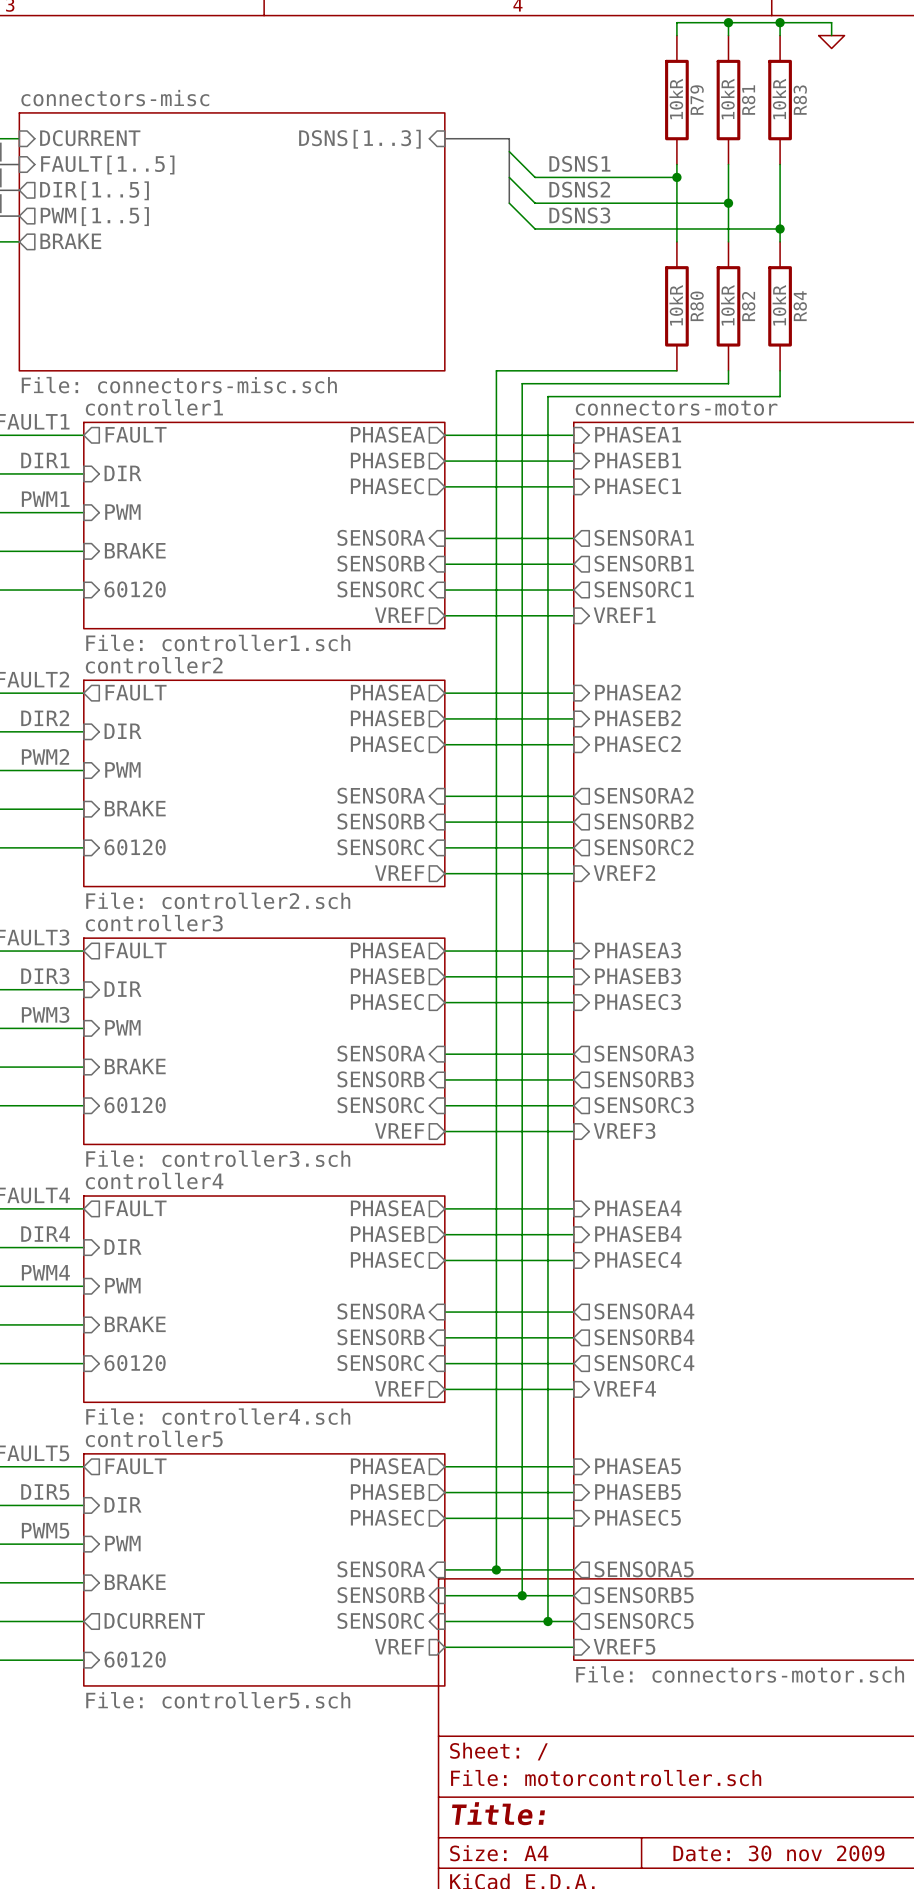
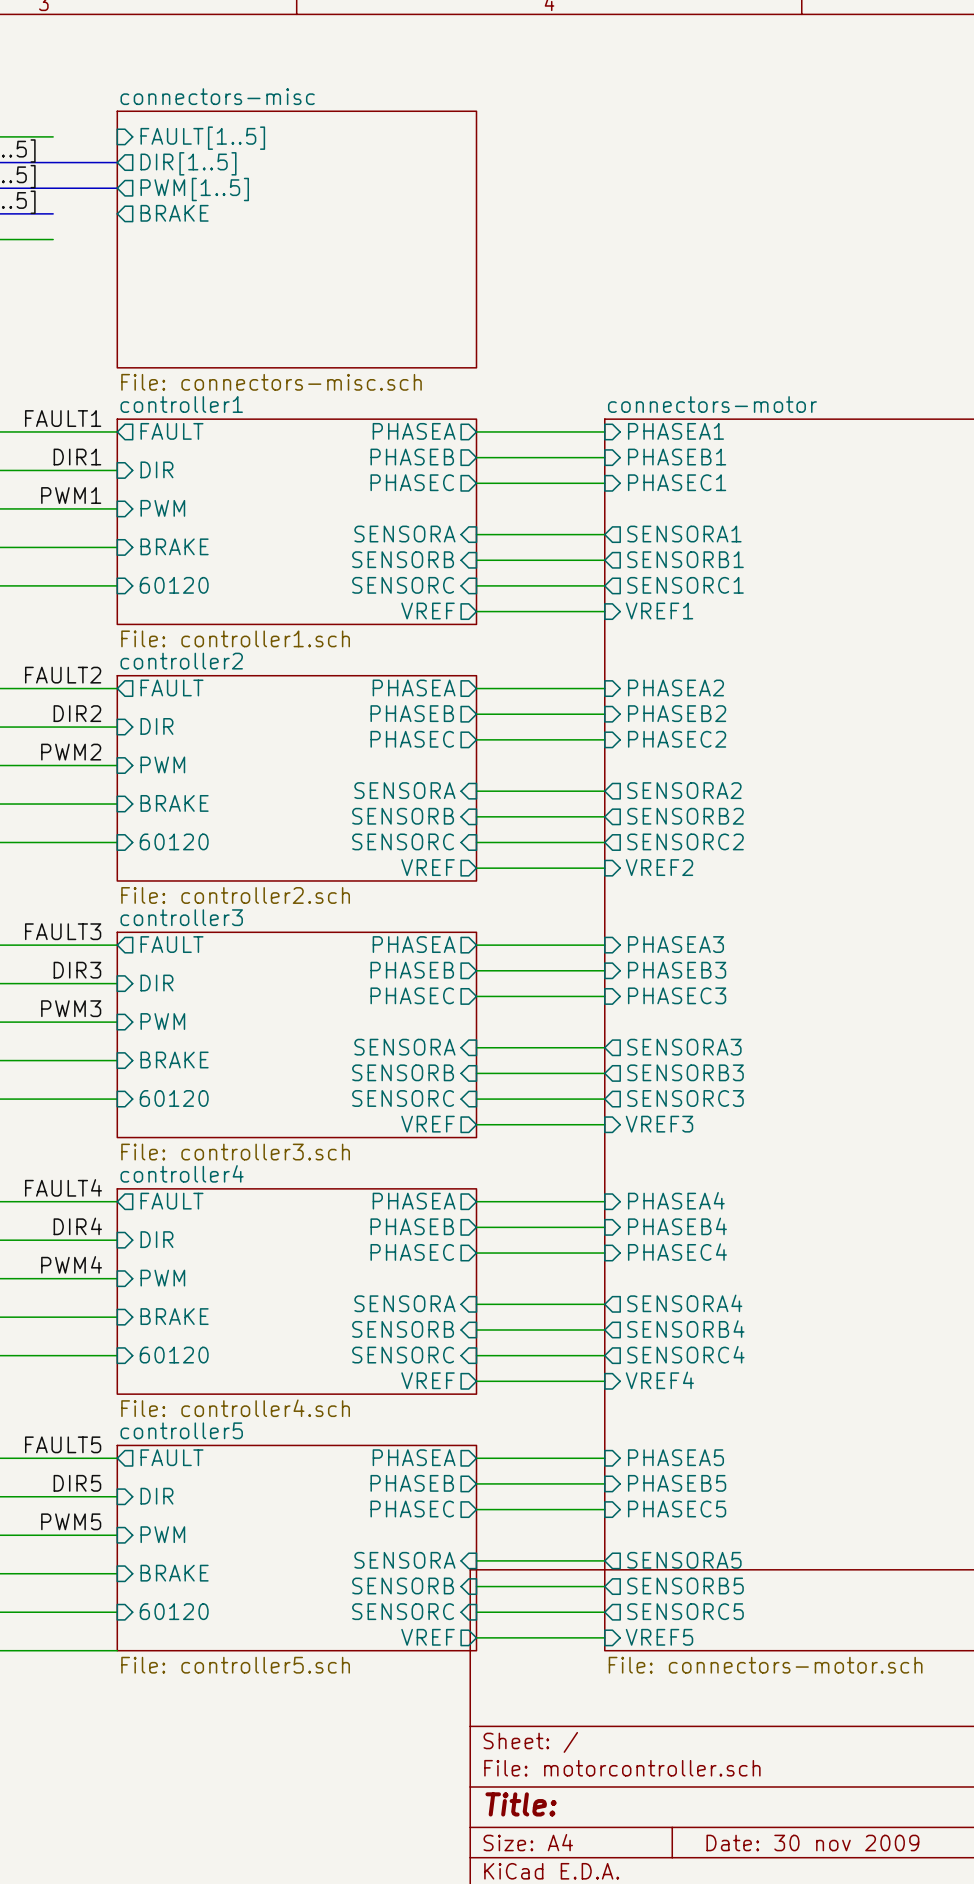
wire: (728, 22) (728, 35) -> none
junction: (728, 22) -> none
wire: (780, 22) (780, 35) -> none
junction: (780, 22) -> none
wire: (676, 35) (676, 22) (831, 22) (831, 35) -> none
power symbol: (831, 42) -> none
R79: 10kR (676, 100) -> none
R81: 10kR (728, 100) -> none
R83: 10kR (780, 100) -> none
sheet pin: DCURRENT (90, 138) -> none
bus: (444, 138) (509, 138) (509, 203) -> none
sheet pin: DSNS[1..3] (359, 139) -> none
wire: (509, 151) (535, 177) (676, 177) -> none
label: DSNS1 (579, 163) -> none
bus: none -> (53, 162) (117, 162)
wire: (676, 164) (676, 241) -> none
wire: (728, 164) (728, 241) -> none
wire: (780, 164) (780, 241) -> none
sheet pin position: FAULT[1..5] (107, 165) -> FAULT[1..5] (202, 138)
wire: (509, 177) (535, 203) (728, 203) -> none
junction: (676, 177) -> none
label: DSNS2 (579, 189) -> none
bus: none -> (53, 188) (117, 188)
sheet pin position: DIR[1..5] (94, 190) -> DIR[1..5] (188, 163)
wire: (509, 203) (535, 228) (780, 228) -> none
junction: (728, 203) -> none
label: DSNS3 (579, 215) -> none
sheet pin position: PWM[1..5] (94, 216) -> PWM[1..5] (194, 189)
junction: (780, 228) -> none
sheet pin position: BRAKE (70, 241) -> BRAKE (174, 213)
sheet connectors-misc: File: connectors-misc.sch (232, 241) -> none
sheet connectors-misc: none -> File: connectors-misc.sch (296, 239)
R80: 10kR (676, 306) -> none
R82: 10kR (728, 306) -> none
R84: 10kR (780, 306) -> none
wire: (676, 370) (496, 370) (496, 1569) -> none
wire: (728, 370) (728, 383) (522, 383) (522, 1595) -> none
wire: (780, 370) (780, 396) (547, 396) (547, 1621) -> none
sheet controller5 shape: [83, 1453, 445, 1686] -> [117, 1445, 477, 1651]
junction: (496, 1569) -> none
junction: (522, 1595) -> none
sheet pin shape: output (154, 1620) -> input (174, 1611)
sheet pin: DCURRENT (154, 1620) -> 60120 (174, 1611)
junction: (547, 1621) -> none
sheet pin: 60120 (135, 1659) -> none

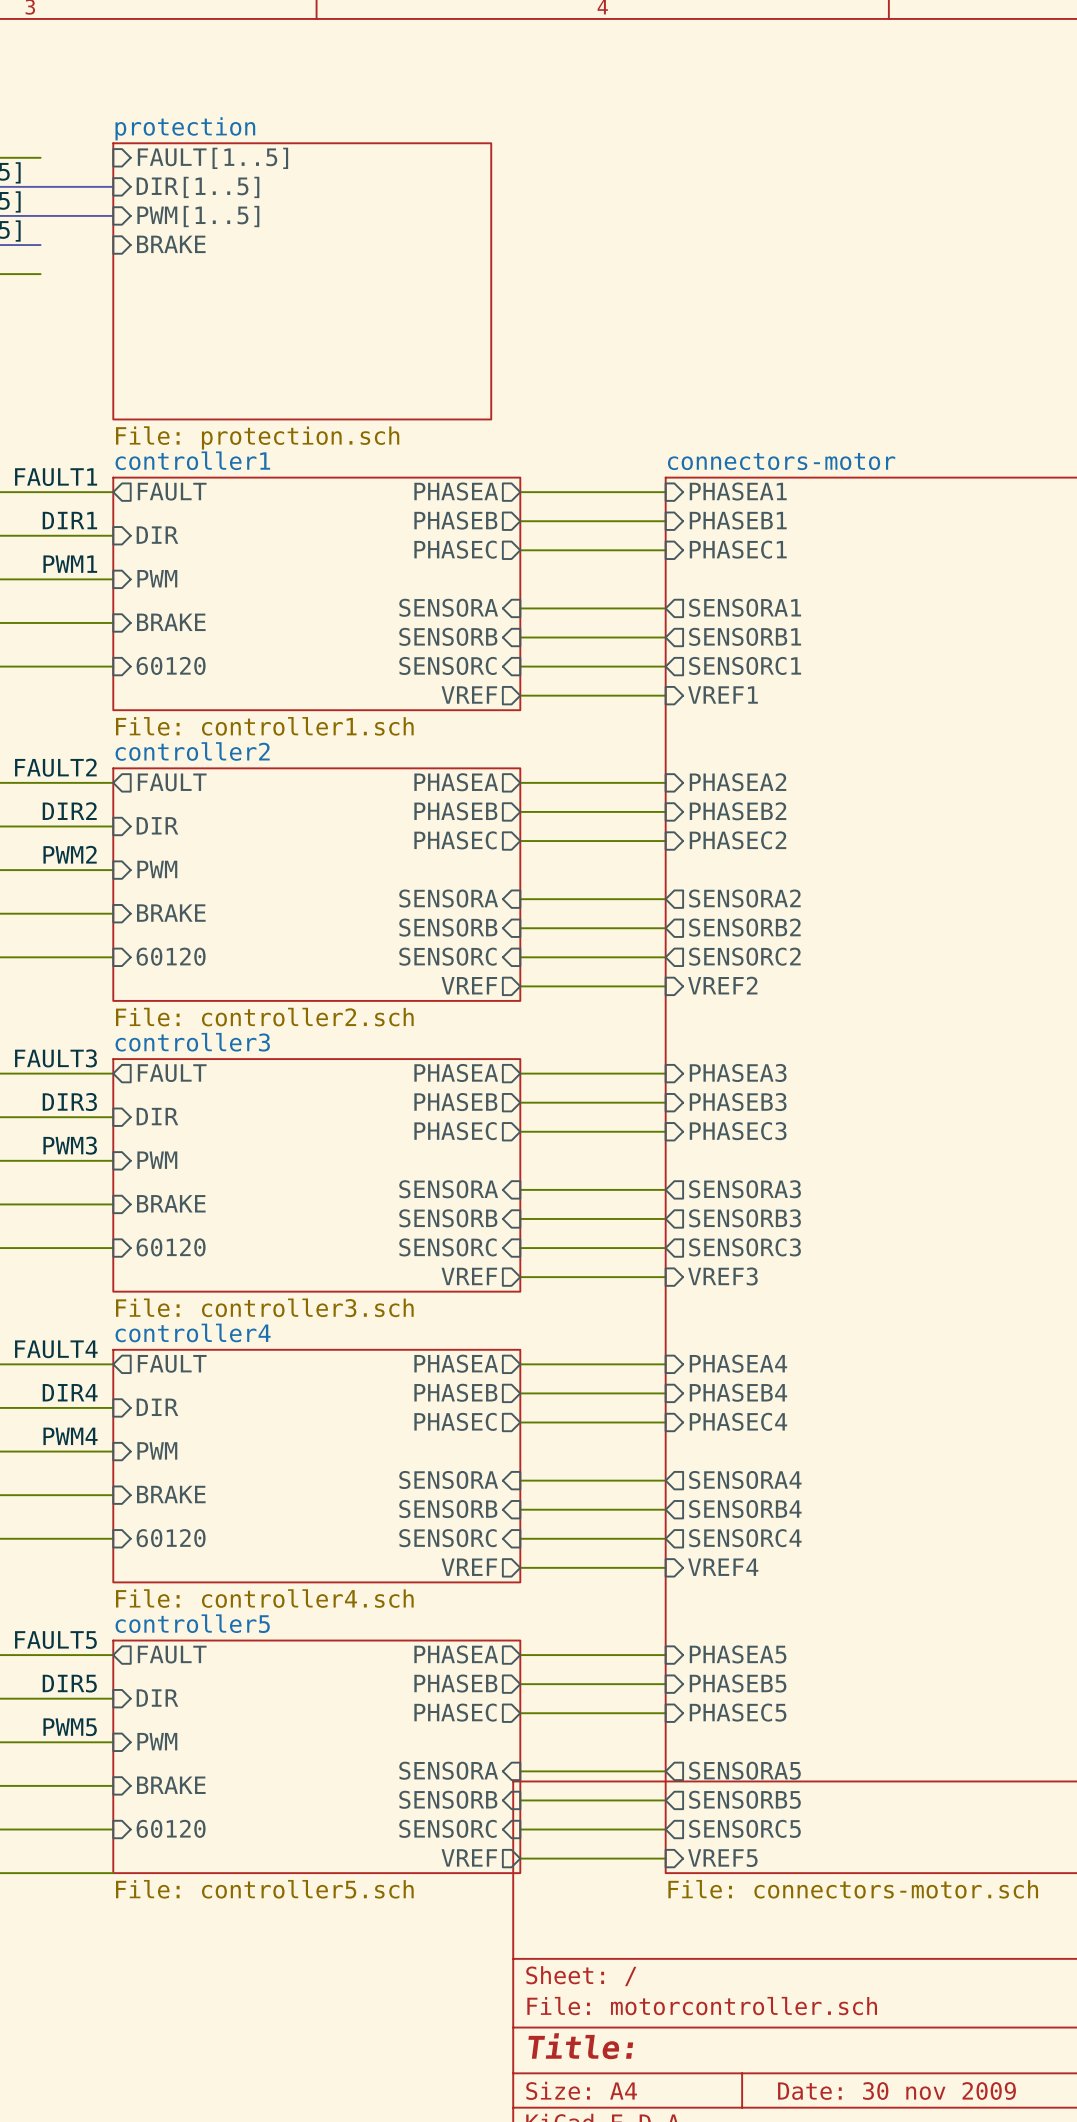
sheet pin shape: output (188, 163) -> input (198, 187)
sheet pin shape: output (194, 189) -> input (198, 216)
sheet pin shape: output (174, 213) -> input (171, 244)
sheet connectors-misc: File: connectors-misc.sch (296, 239) -> none
sheet protection: none -> File: protection.sch (302, 281)

